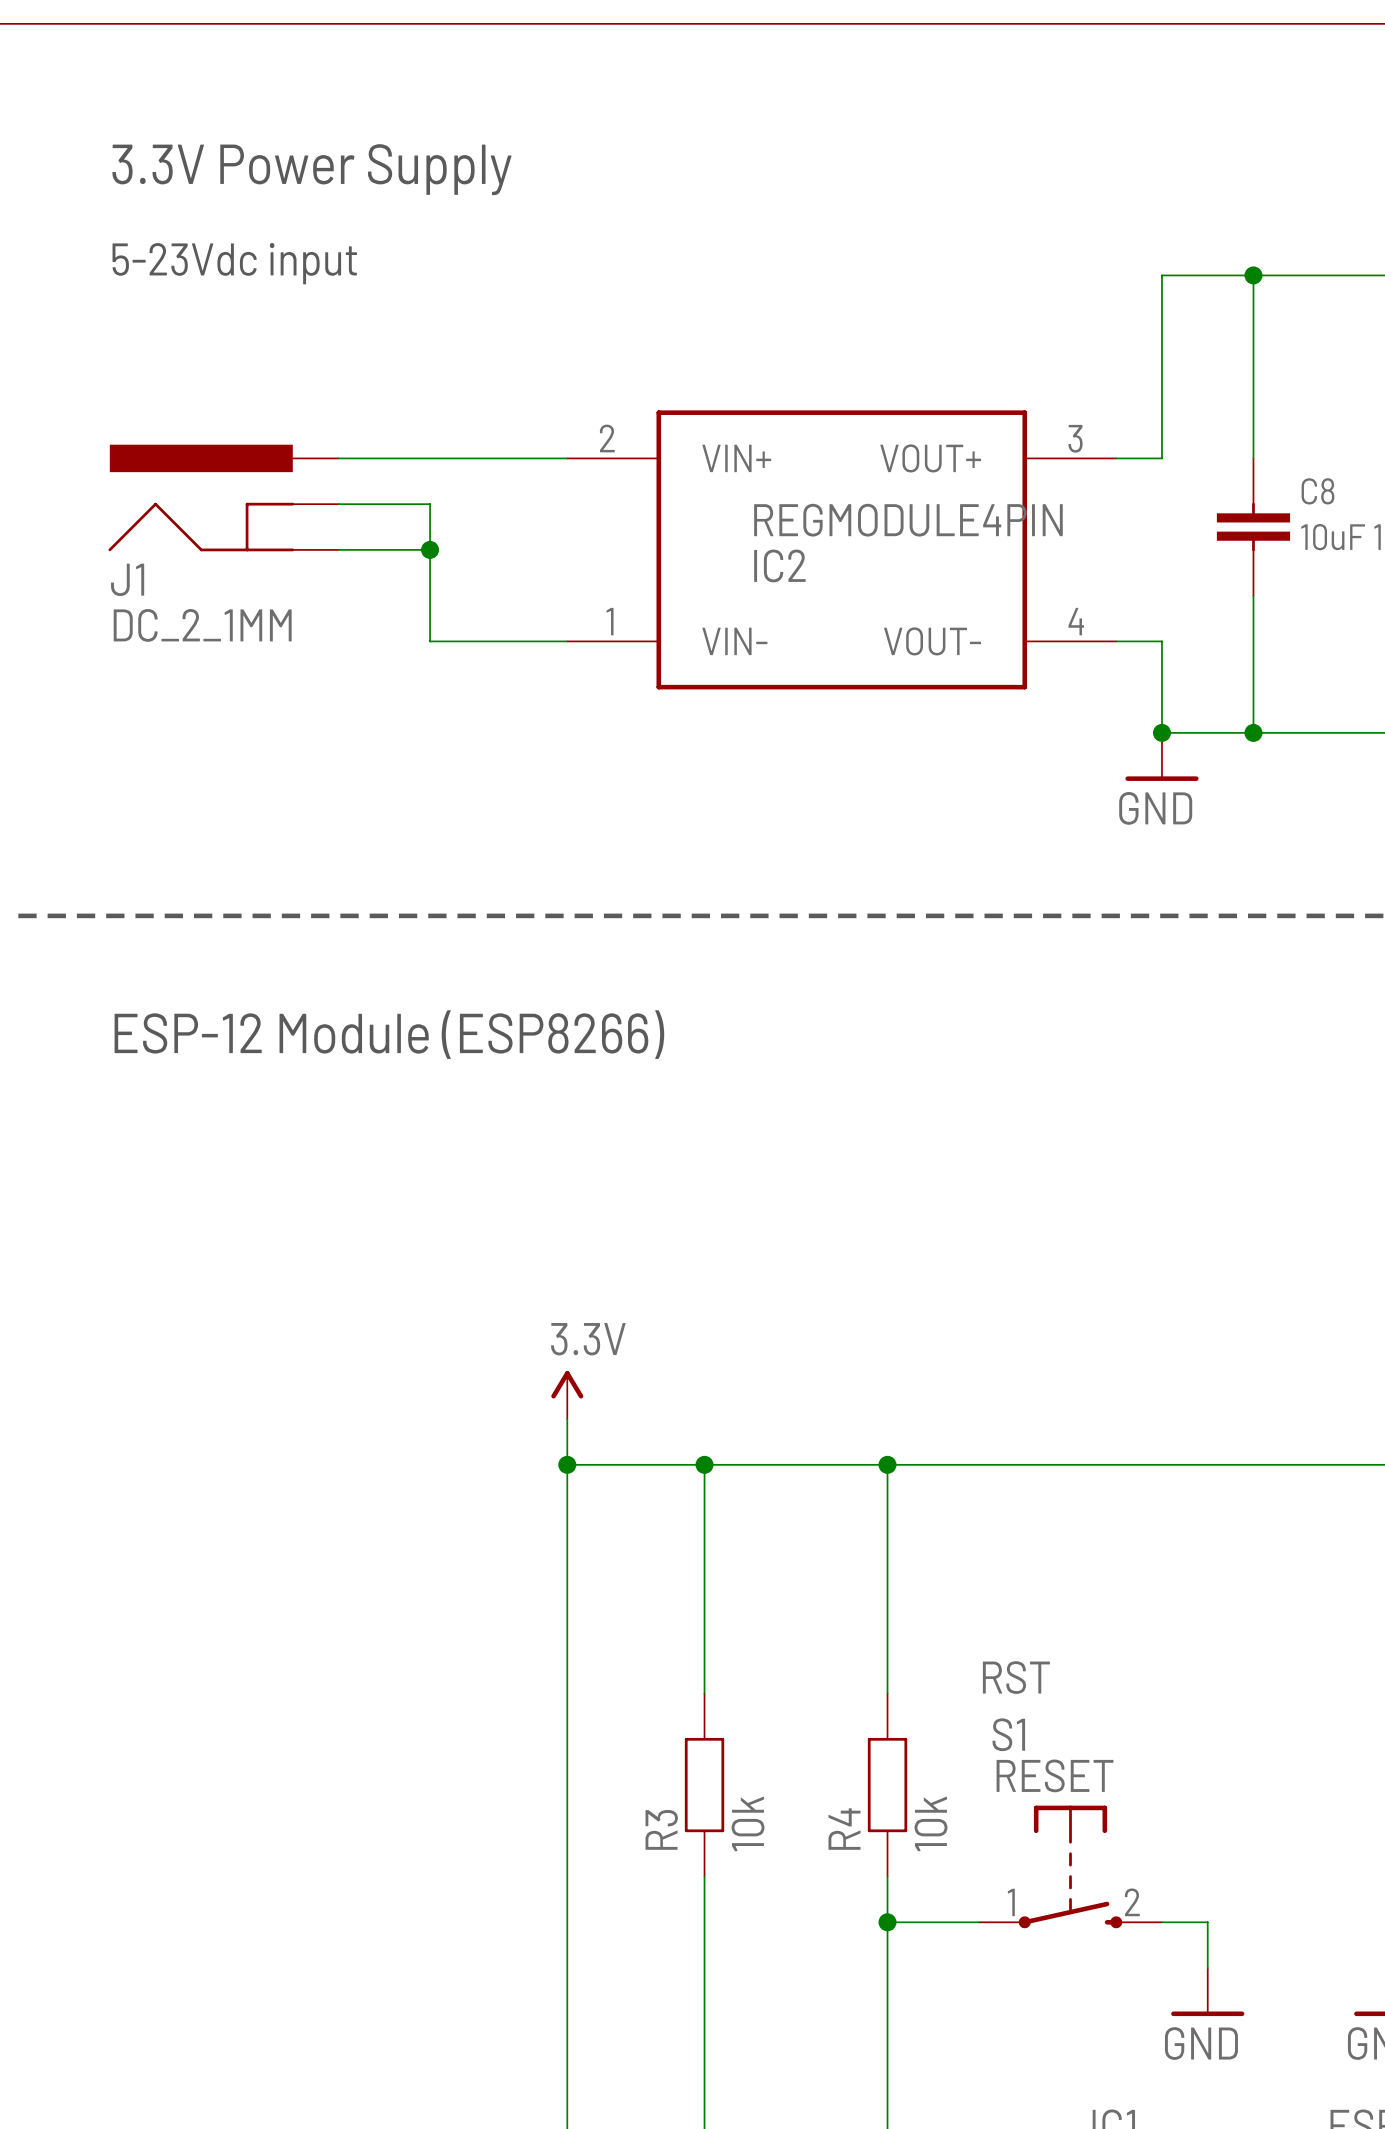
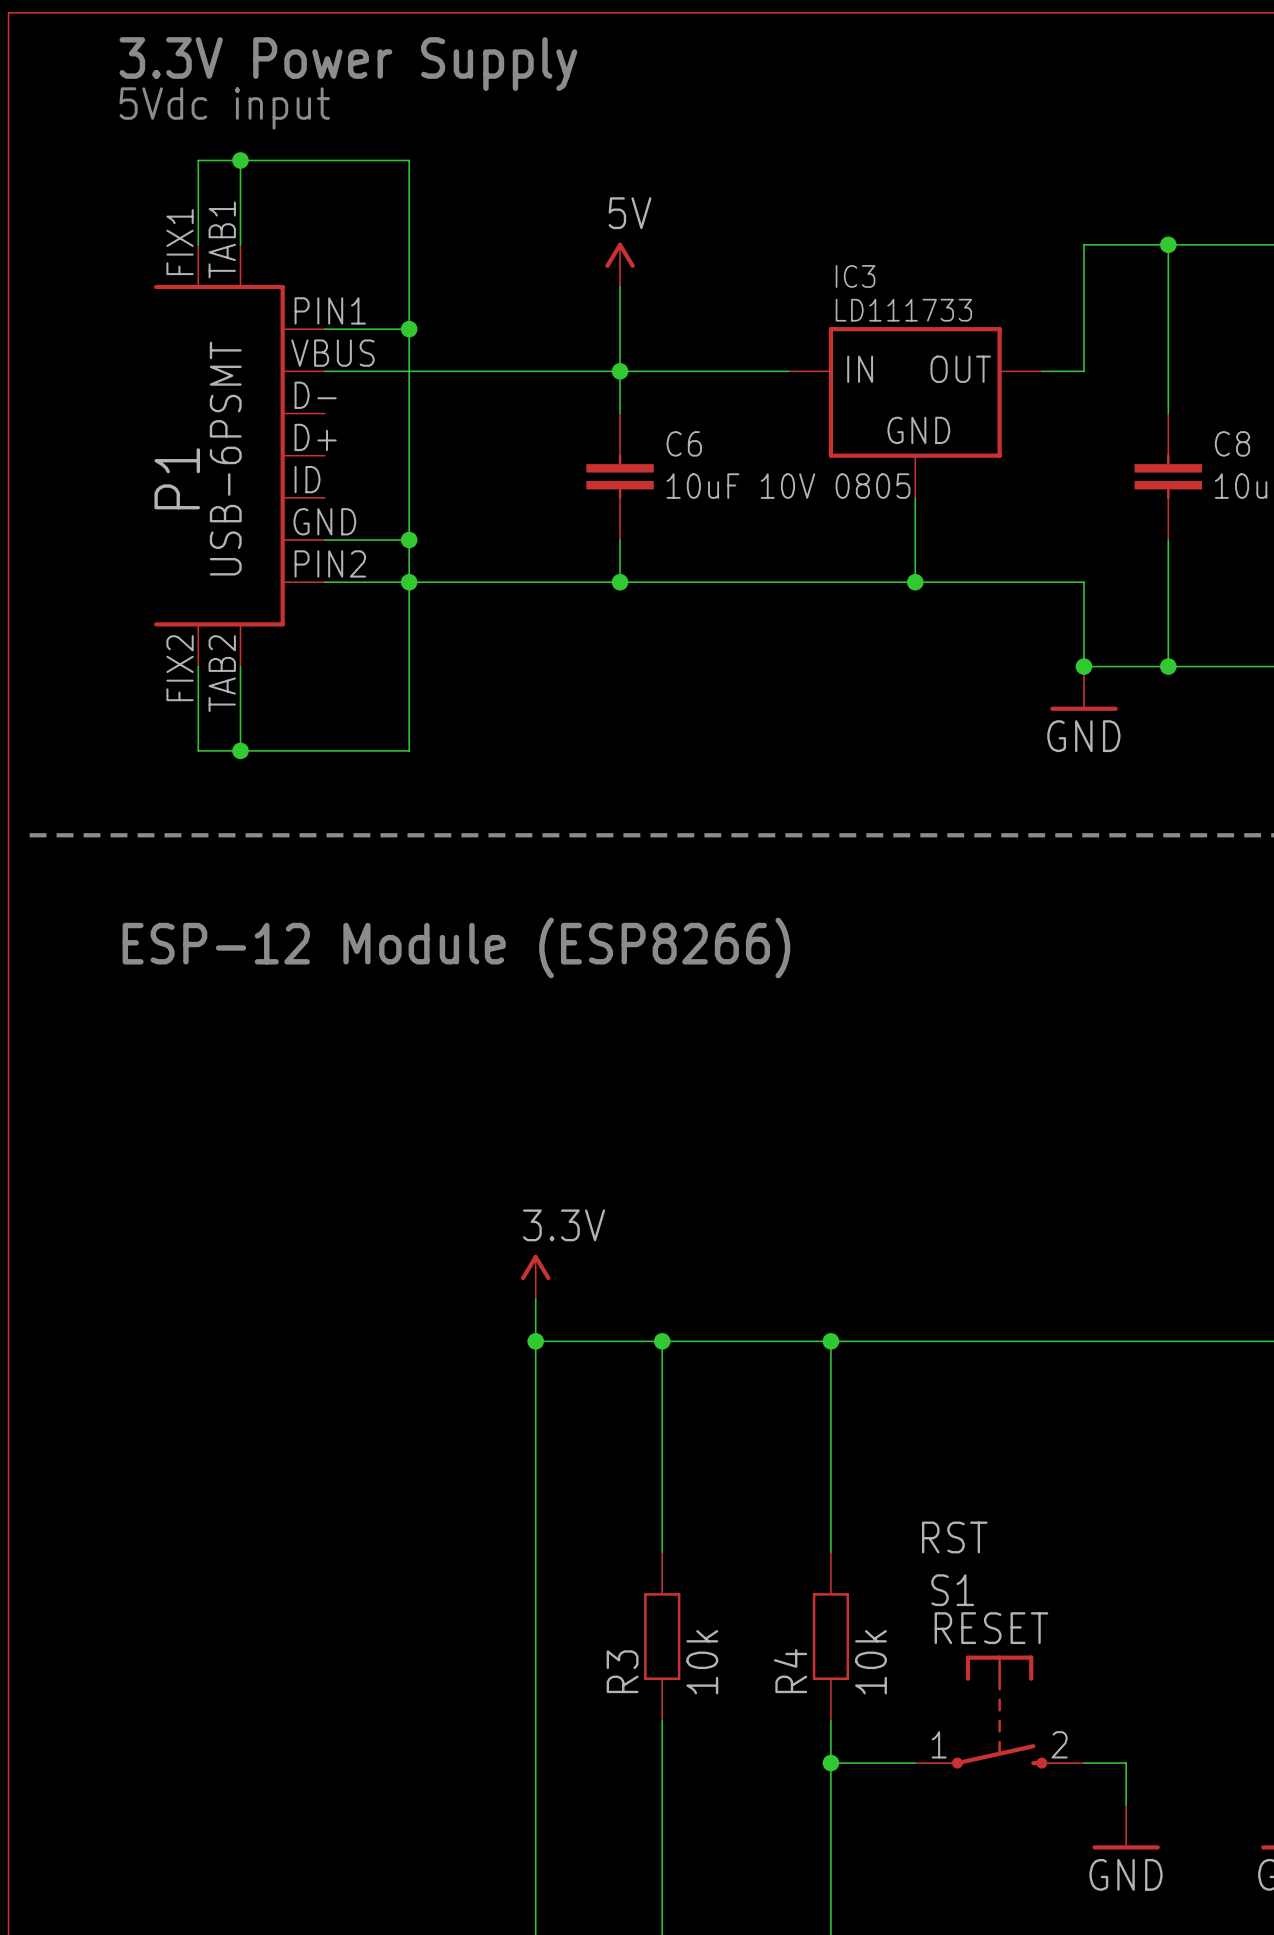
text: none -> 5Vdc input (224, 108)
text position: 3.3V Power Supply (312, 169) -> 3.3V Power Supply (348, 64)
wire: none -> (240, 160) (240, 244)
junction: none -> (240, 160)
text: 5-23Vdc input (234, 263) -> none
power symbol: none -> 5V (620, 264)
wire: none -> (620, 287) (620, 413)
wire: none -> (324, 329) (409, 329)
junction: none -> (409, 329)
wire: none -> (324, 371) (788, 371)
junction: none -> (620, 371)
wire: (1161, 412) (1161, 458) (1116, 458) -> (1083, 371) (1041, 371)
IC3: none -> LD111733 (915, 412)
wire: (338, 458) (567, 458) -> none
J1: DC_2_1MM (223, 497) -> none
P1: none -> USB-6PSMT (239, 455)
wire: (338, 504) (430, 504) -> (198, 244) (198, 160) (409, 160) (409, 455)
C6: none -> 10uF 10V 0805 (620, 476)
wire: (338, 549) (430, 549) -> (324, 540) (409, 540)
junction: (430, 549) -> none
IC2: REGMODULE4PIN (841, 549) -> none
wire: none -> (915, 497) (915, 582)
junction: none -> (409, 540)
wire: none -> (324, 582) (409, 582) (409, 750) (198, 750) (198, 666)
junction: none -> (409, 582)
wire: none -> (535, 582) (1041, 582)
junction: none -> (620, 582)
junction: none -> (915, 582)
wire: none -> (240, 666) (240, 750)
junction: none -> (240, 750)

